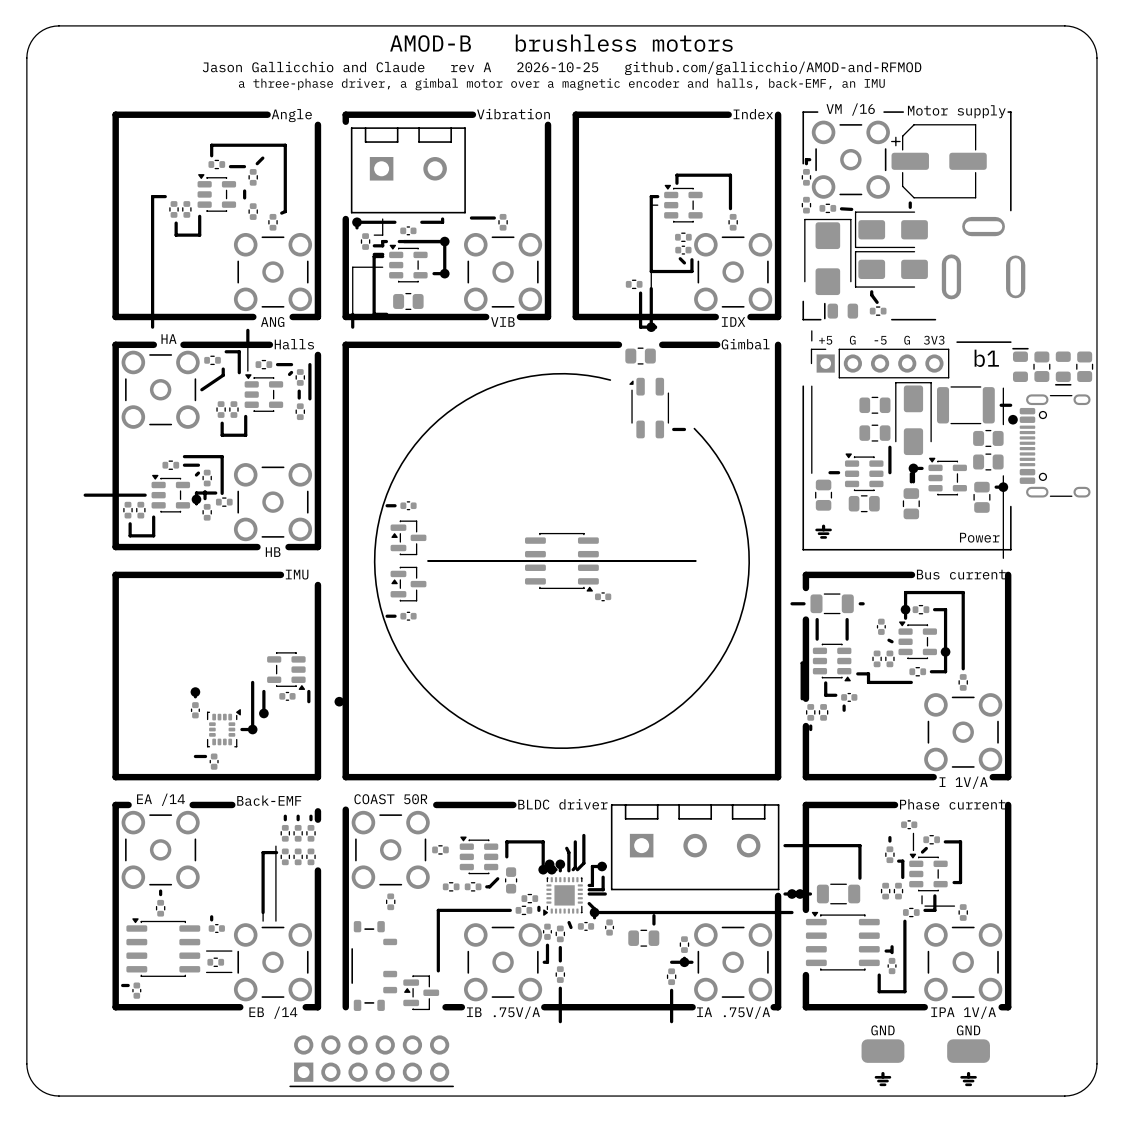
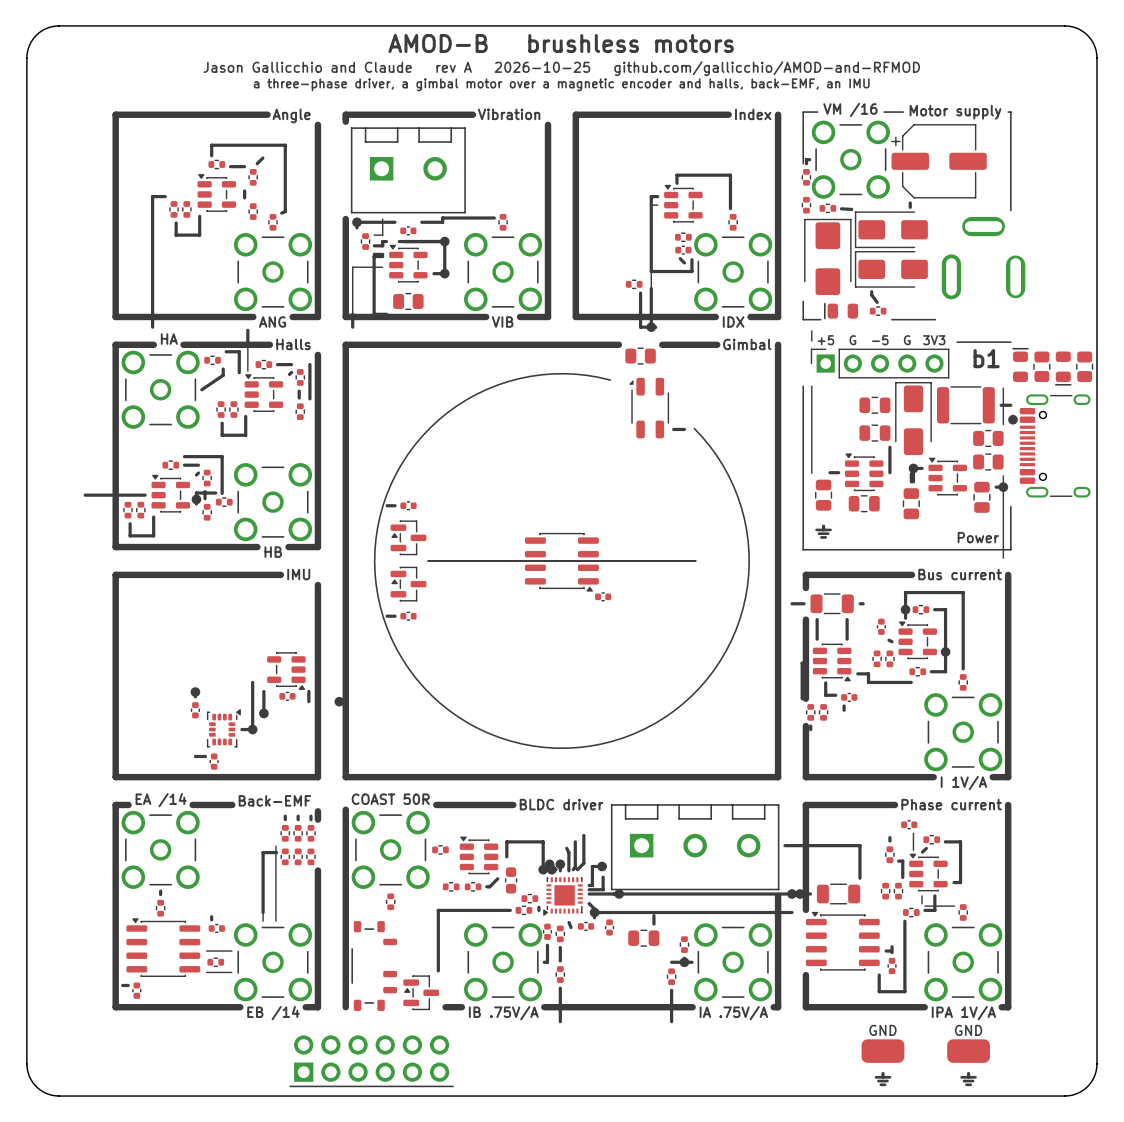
line: none -> (471, 218) (442, 219)
drawing: none -> [614, 889, 624, 899]
line: none -> (605, 894) (784, 894)

